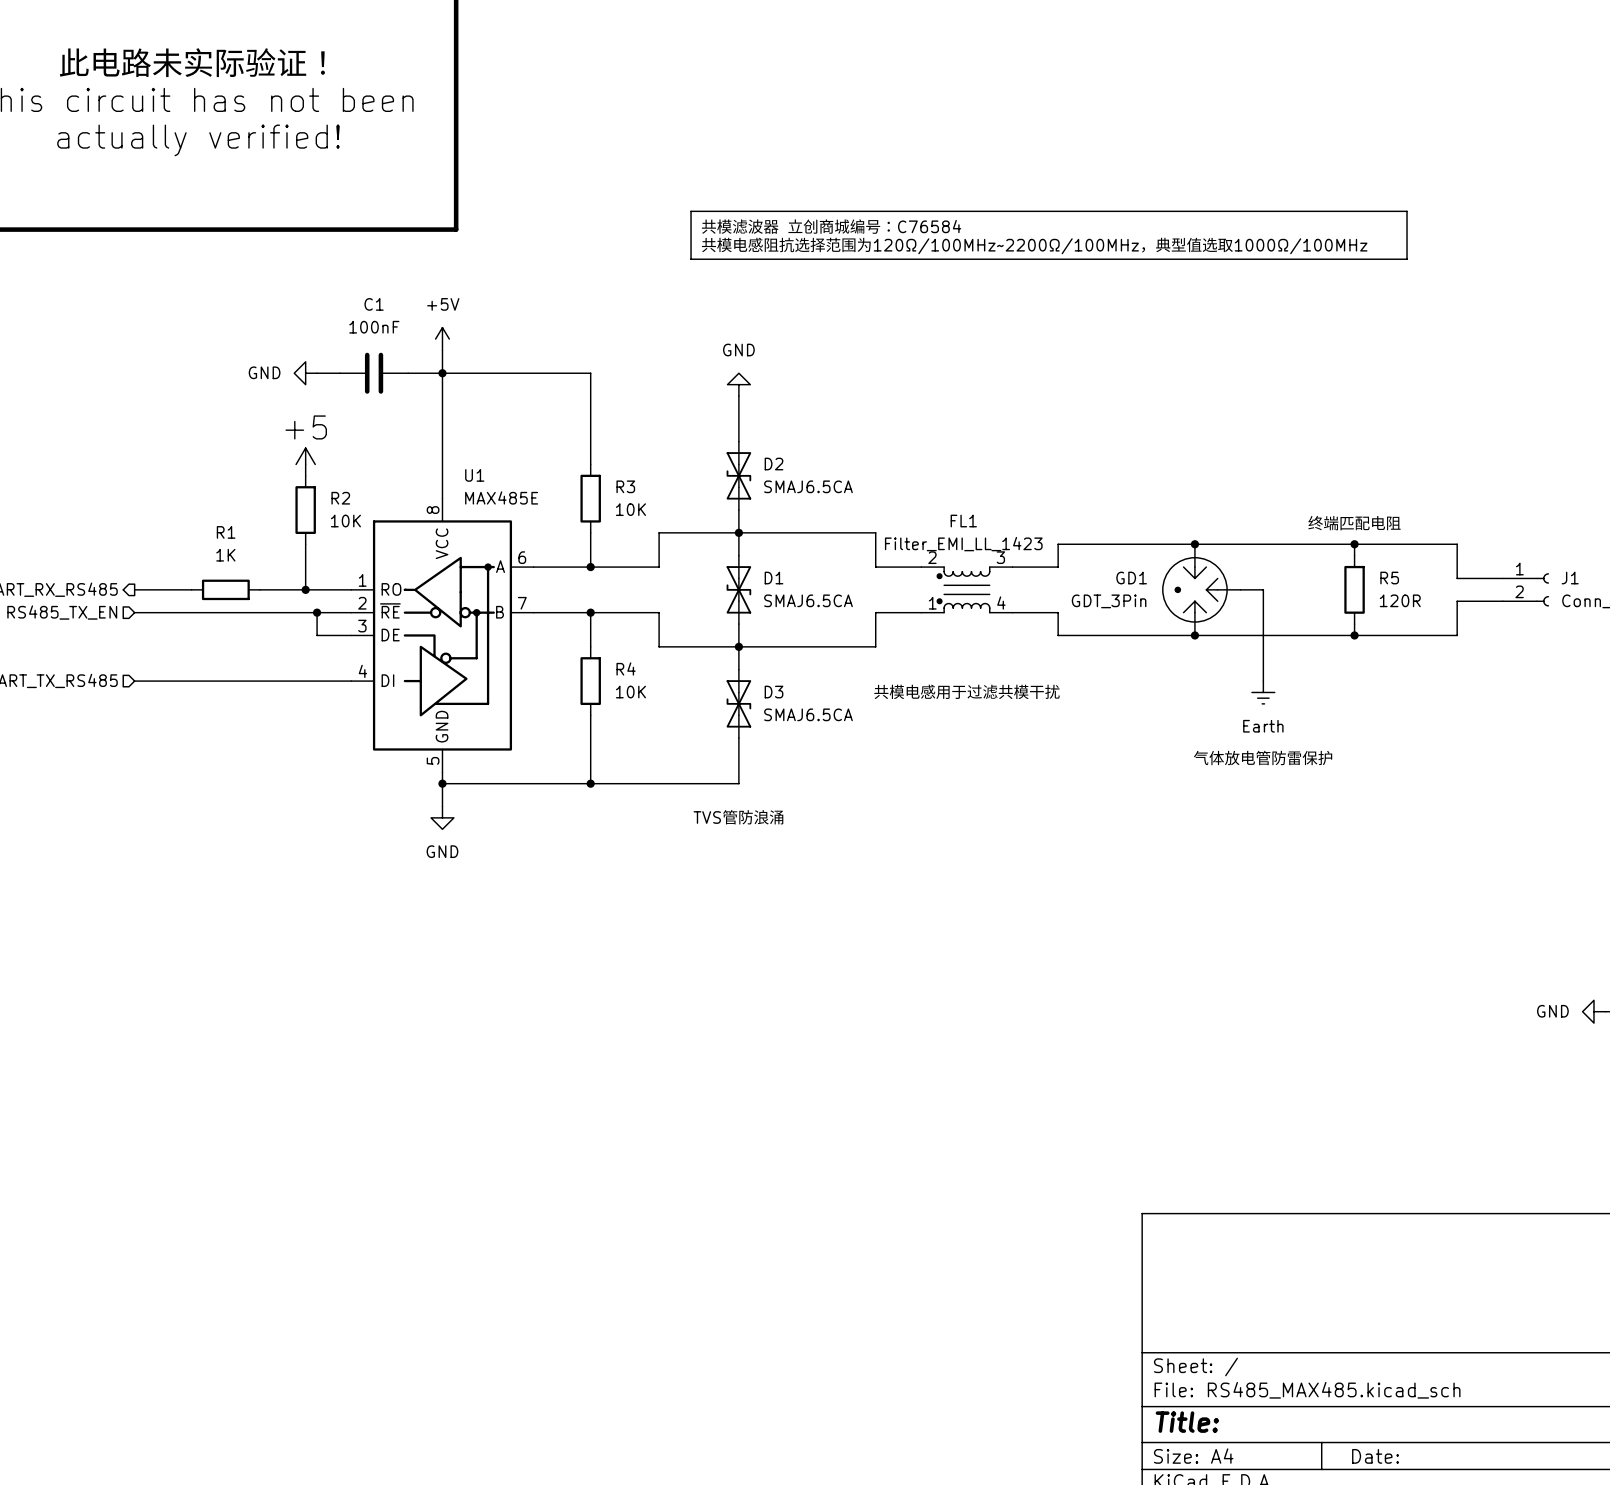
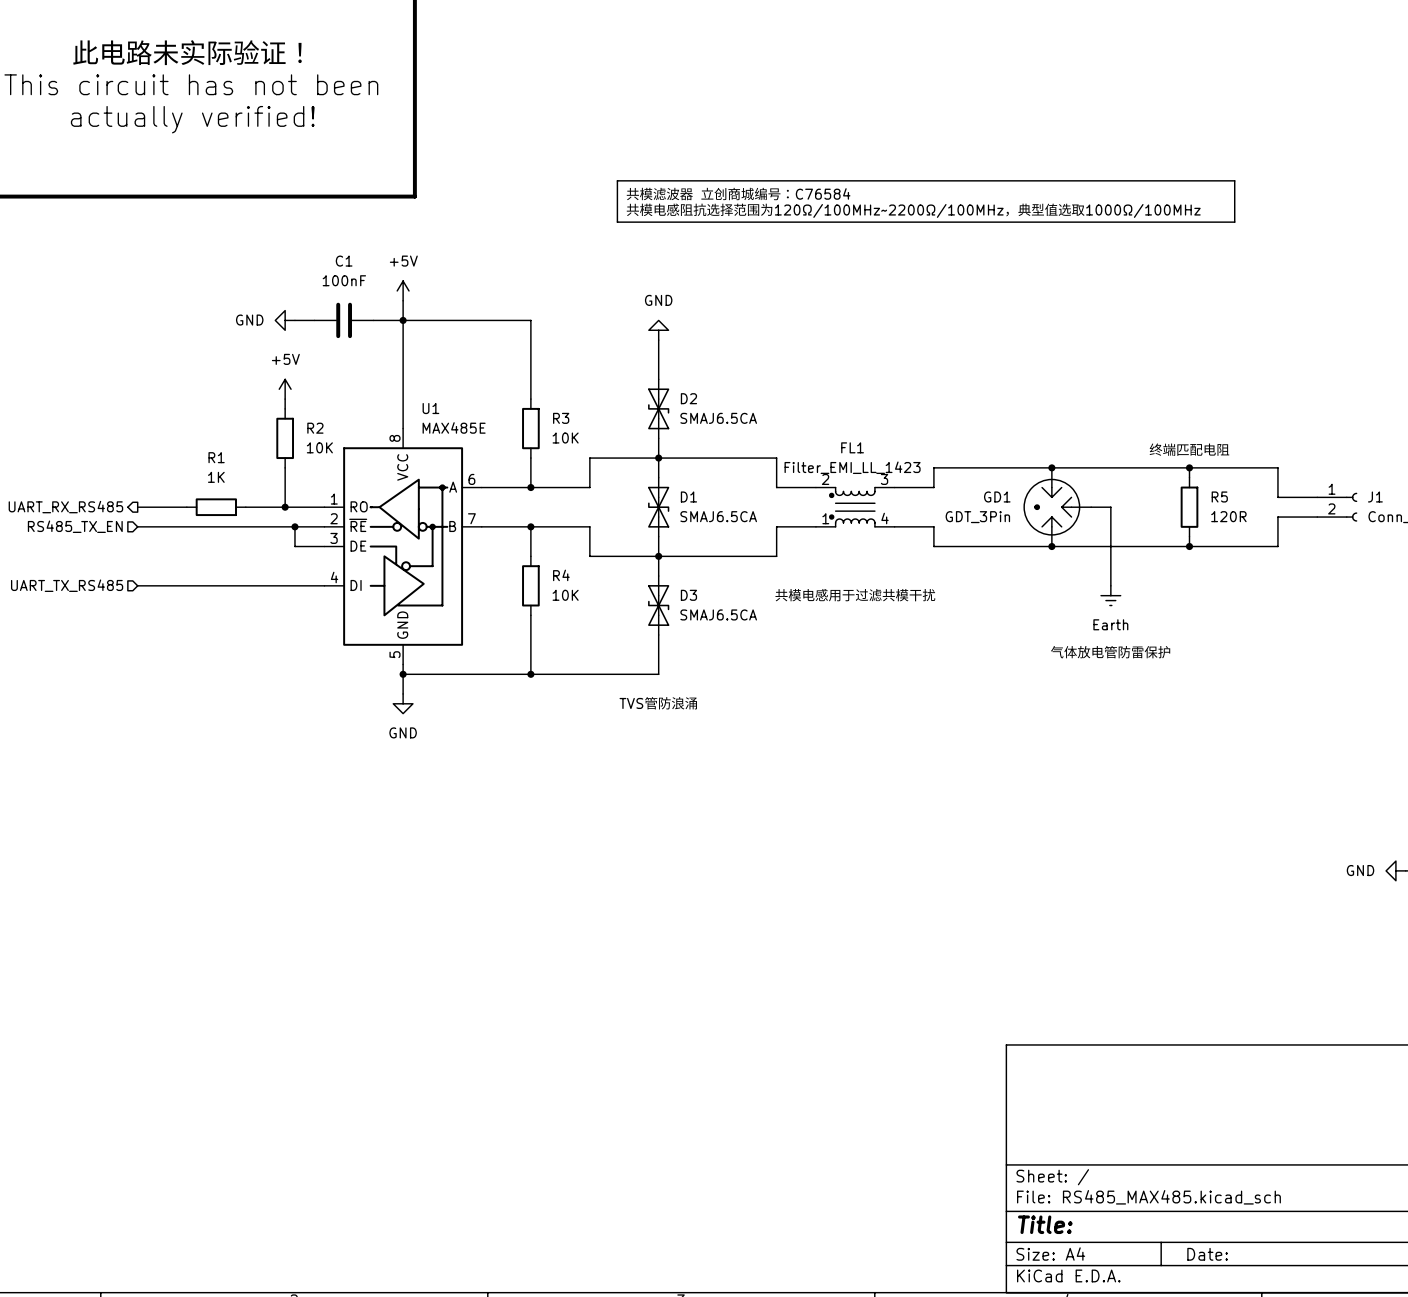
power symbol text: none -> +5V (285, 359)
power symbol shape: [296, 448, 316, 465] -> [279, 379, 292, 400]

